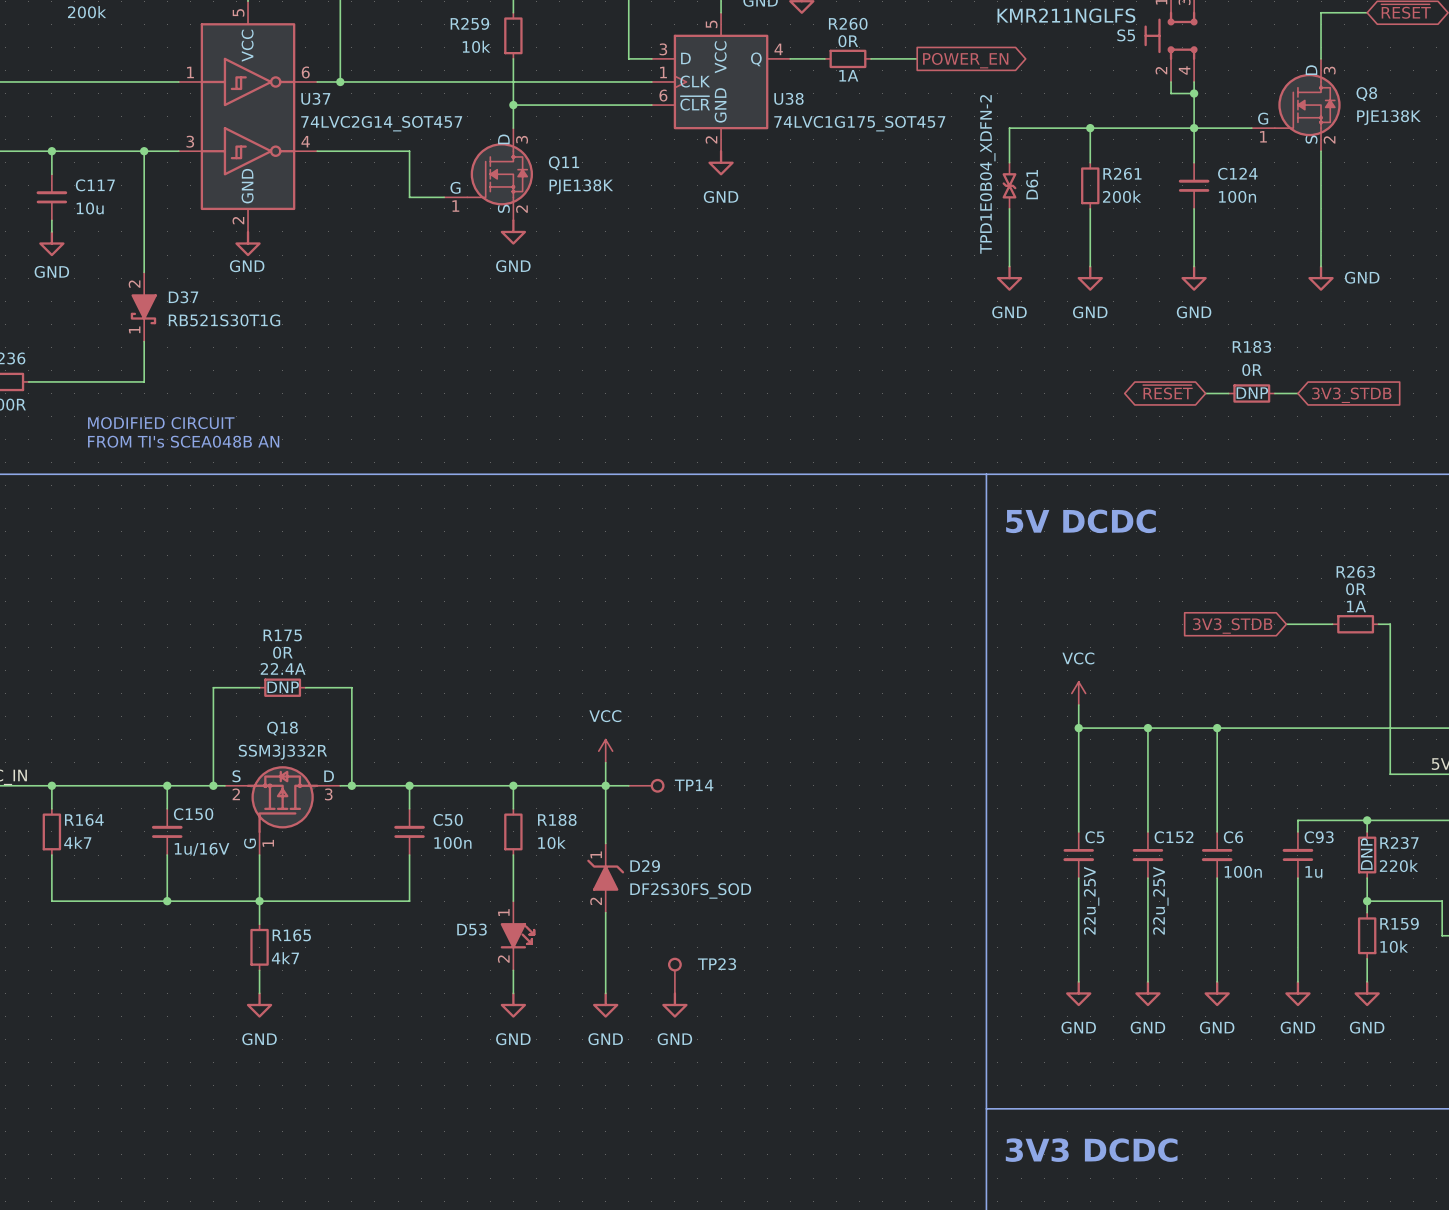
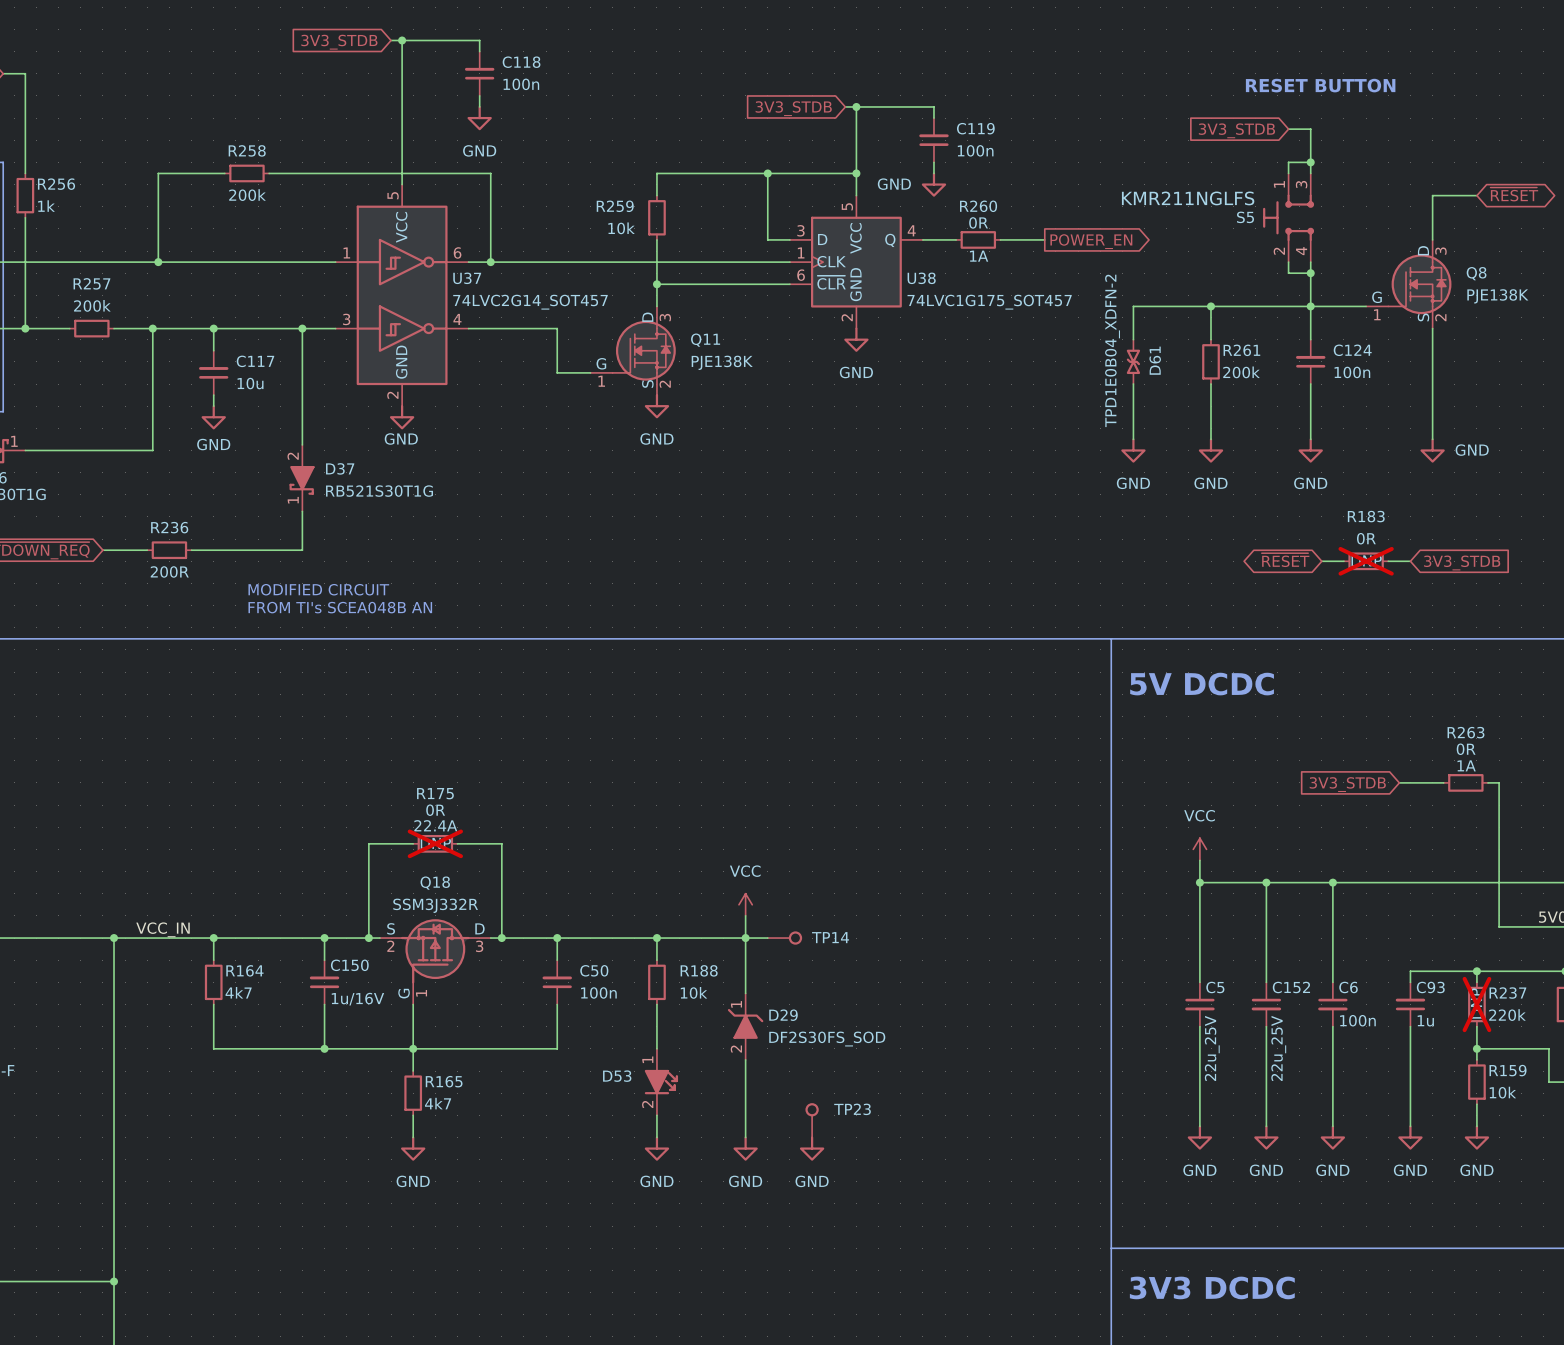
R183 do-not-place cross: none -> (1366, 561)
R175 do-not-place cross: none -> (435, 843)
R237 do-not-place cross: none -> (1476, 1004)

